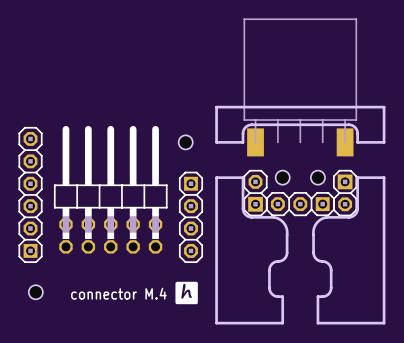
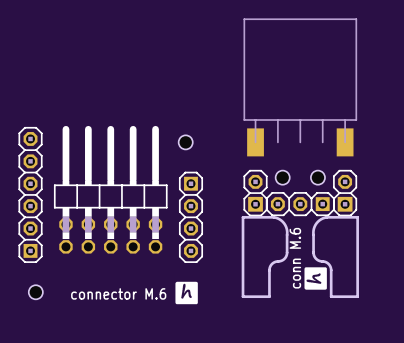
board edge: (216, 107) (216, 142) (243, 142) (244, 129) (251, 124) (349, 124) (356, 130) (357, 142) (384, 142) (384, 107) (216, 107) -> none
part rotation: 0° (345, 193) -> 180° (345, 193)
board edge: (251, 217) (246, 215) (243, 210) (243, 177) (216, 177) (216, 323) (282, 323) (282, 296) (273, 295) (269, 287) -> (251, 217) (243, 217) (243, 296) (269, 296) (269, 287)
board edge: (348, 217) (354, 215) (357, 210) (357, 177) (384, 177) (384, 323) (317, 323) (317, 296) (326, 295) (331, 287) -> (348, 217) (357, 217) (357, 296) (331, 296) (331, 287)
text: none -> conn M.6 (295, 258)
drawing: none -> [304, 267, 327, 290]
text: connector M.4 (118, 293) -> connector M.6 (118, 293)

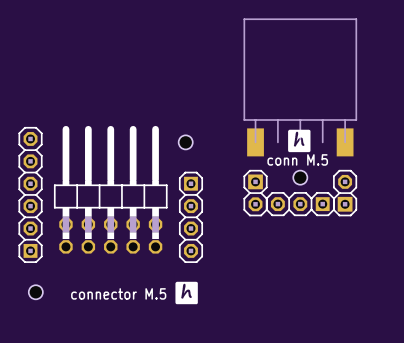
drawing: none -> [288, 129, 311, 153]
text: none -> conn M.5 (297, 159)
hole: (282, 177) -> none
hole: none -> (300, 177)
hole: (317, 177) -> none
part rotation: 0° (255, 193) -> 180° (255, 193)
board edge: (243, 217) (275, 217) (282, 221) (286, 226) (286, 254) (283, 259) (273, 262) (270, 266) (269, 296) (243, 296) (243, 217) -> none
board edge: (326, 217) (357, 217) (357, 296) (331, 296) (330, 266) (314, 255) (313, 228) (317, 221) (326, 217) -> none
text: conn M.6 (295, 258) -> none
drawing: [304, 267, 327, 290] -> none
text: connector M.6 (118, 293) -> connector M.5 (118, 293)

